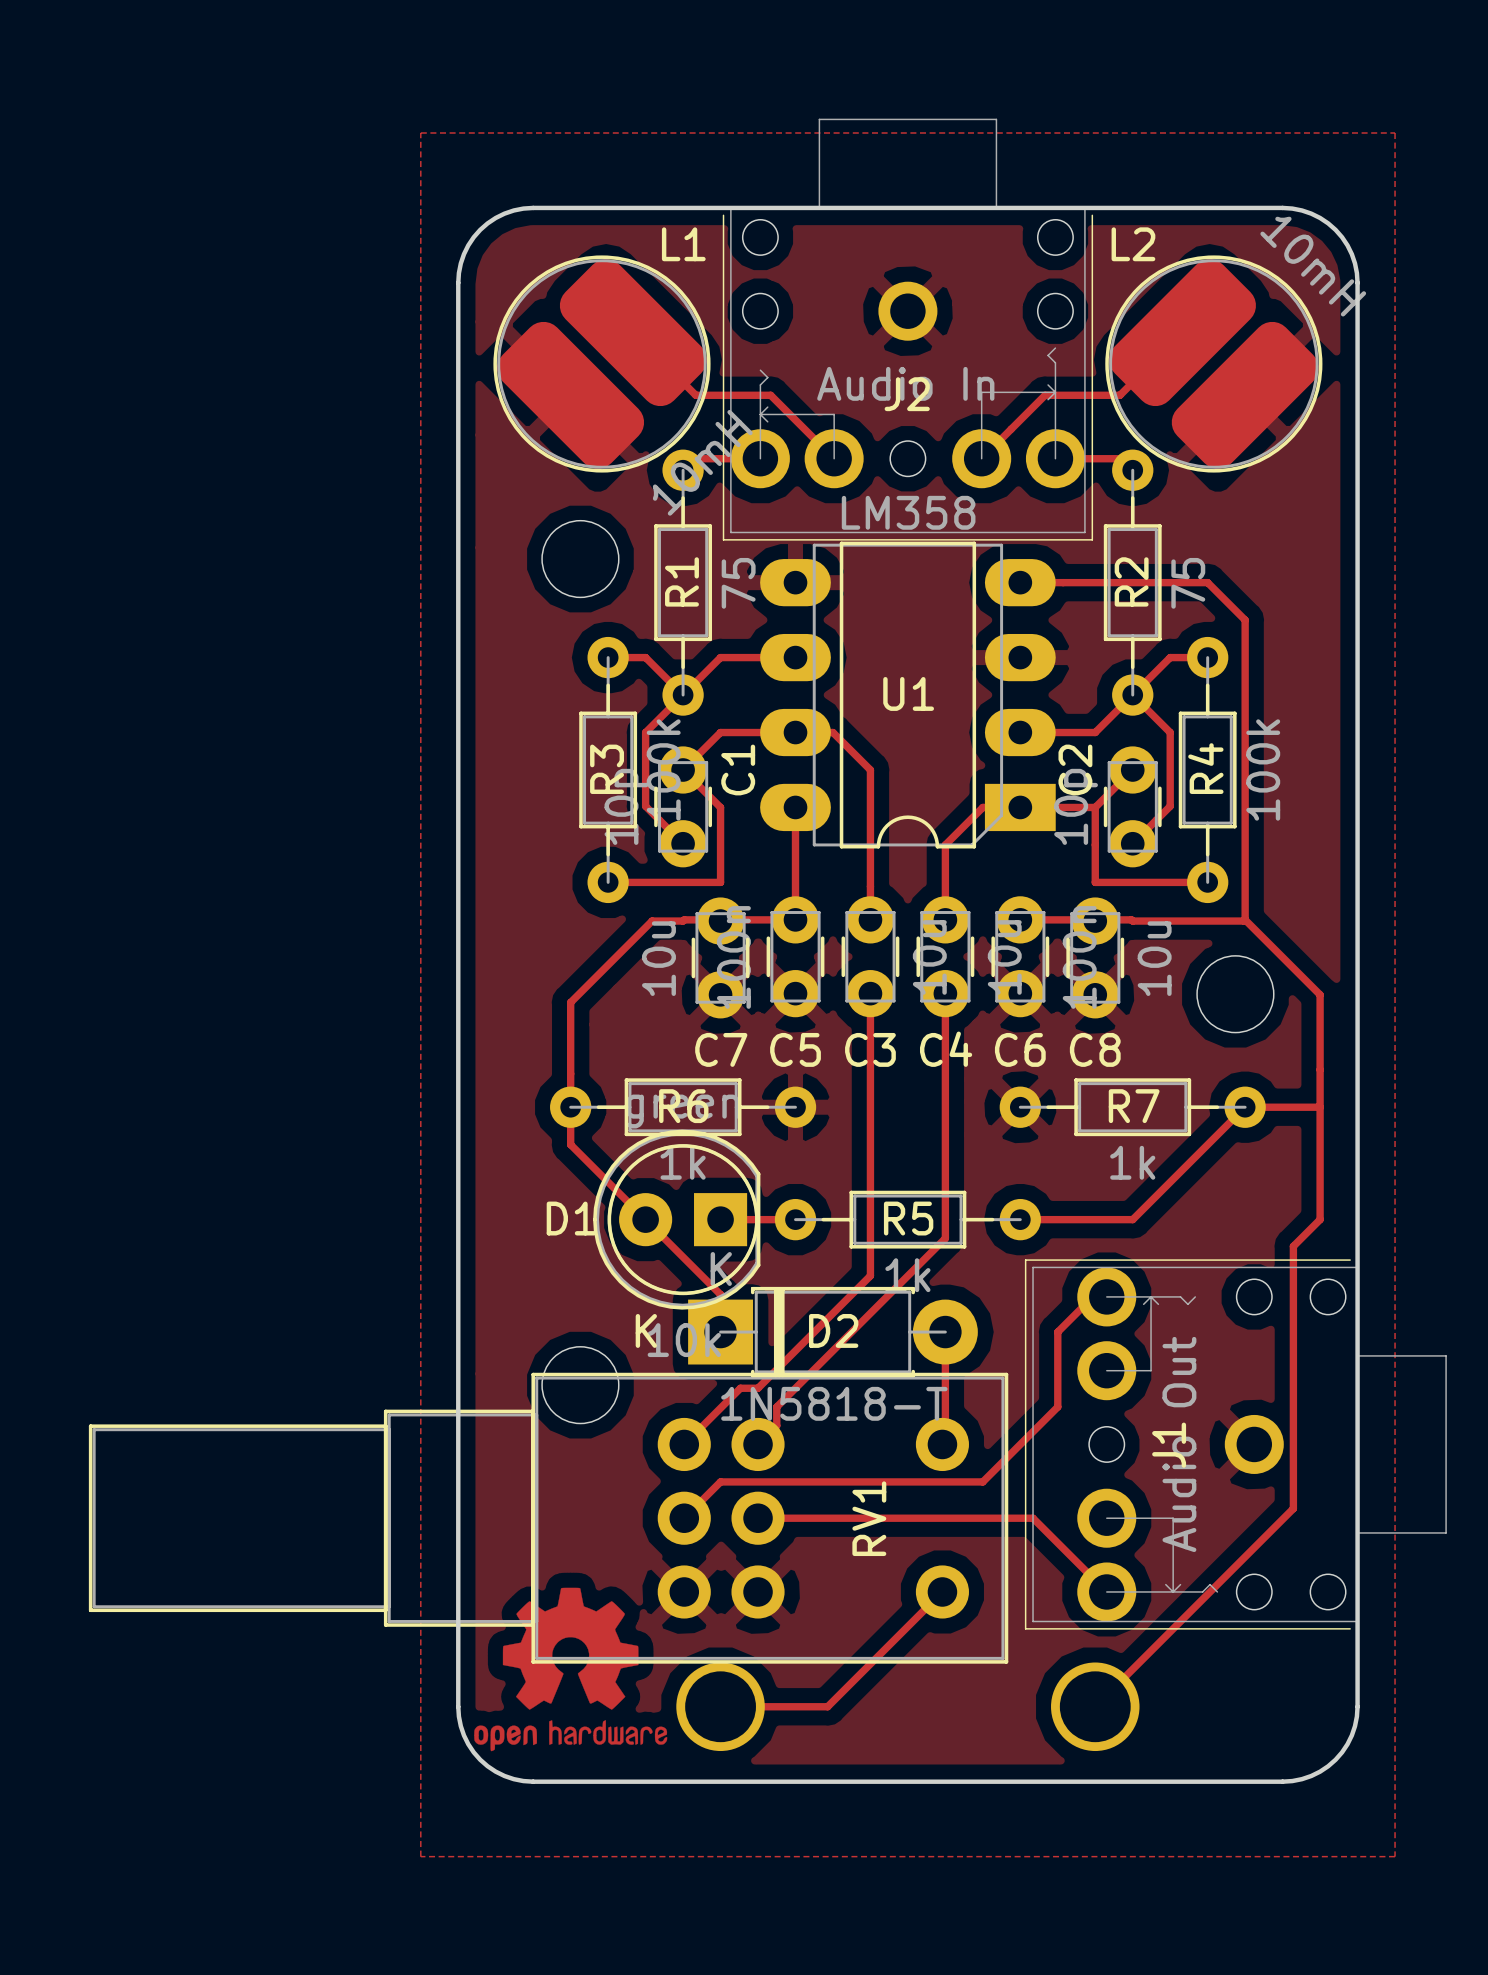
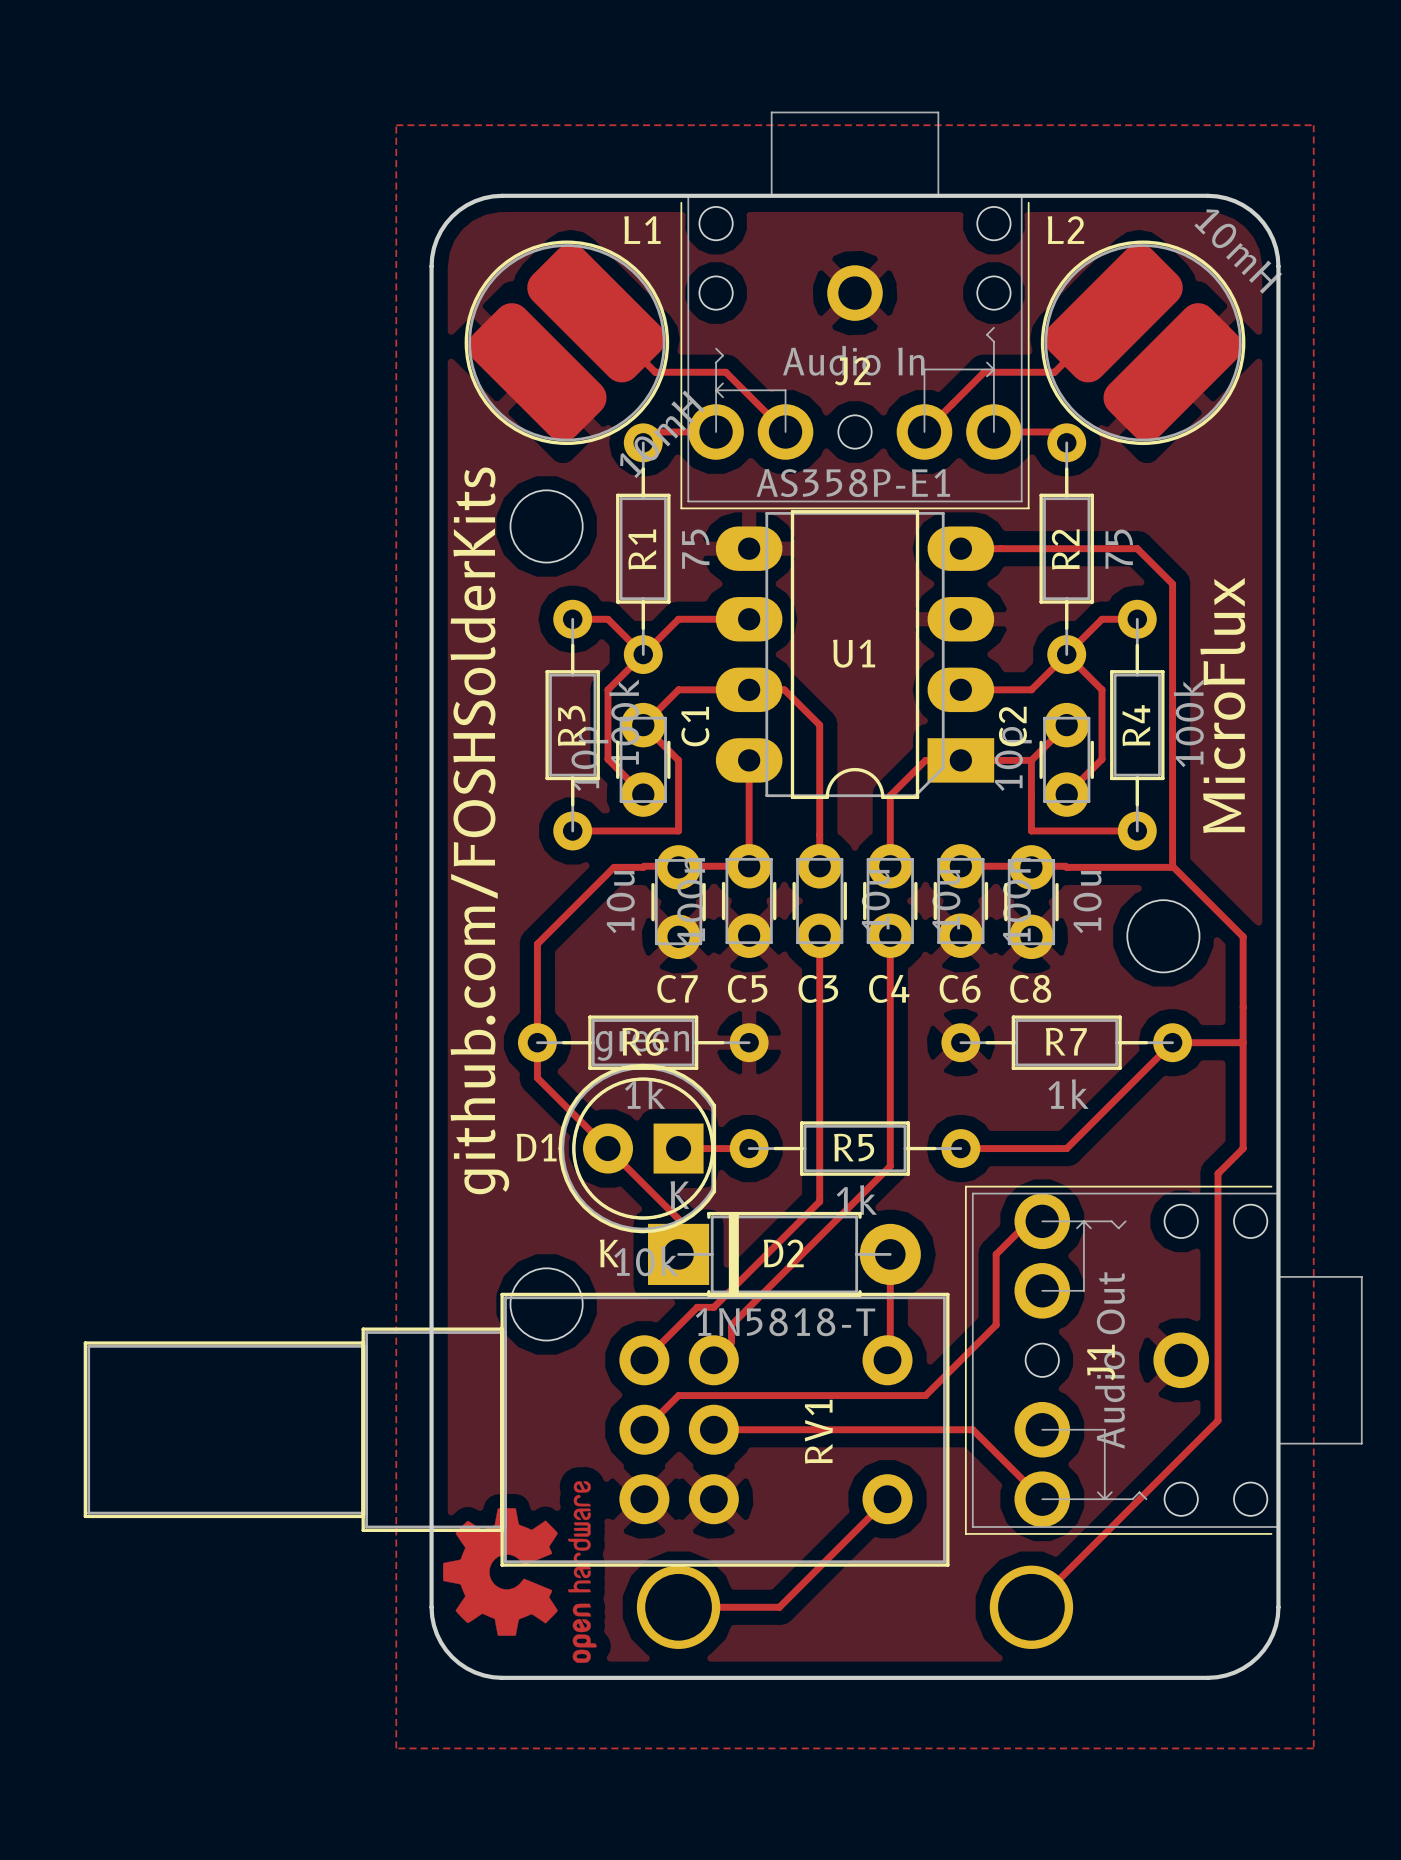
U1 value: LM358 (908, 512) -> AS358P-E1 (853, 483)
text: none -> MicroFlux (1222, 705)
text: none -> github.com/FOSHSolderKits (479, 830)
drawing shape: [474, 1587, 668, 1752] -> [443, 1481, 597, 1663]

